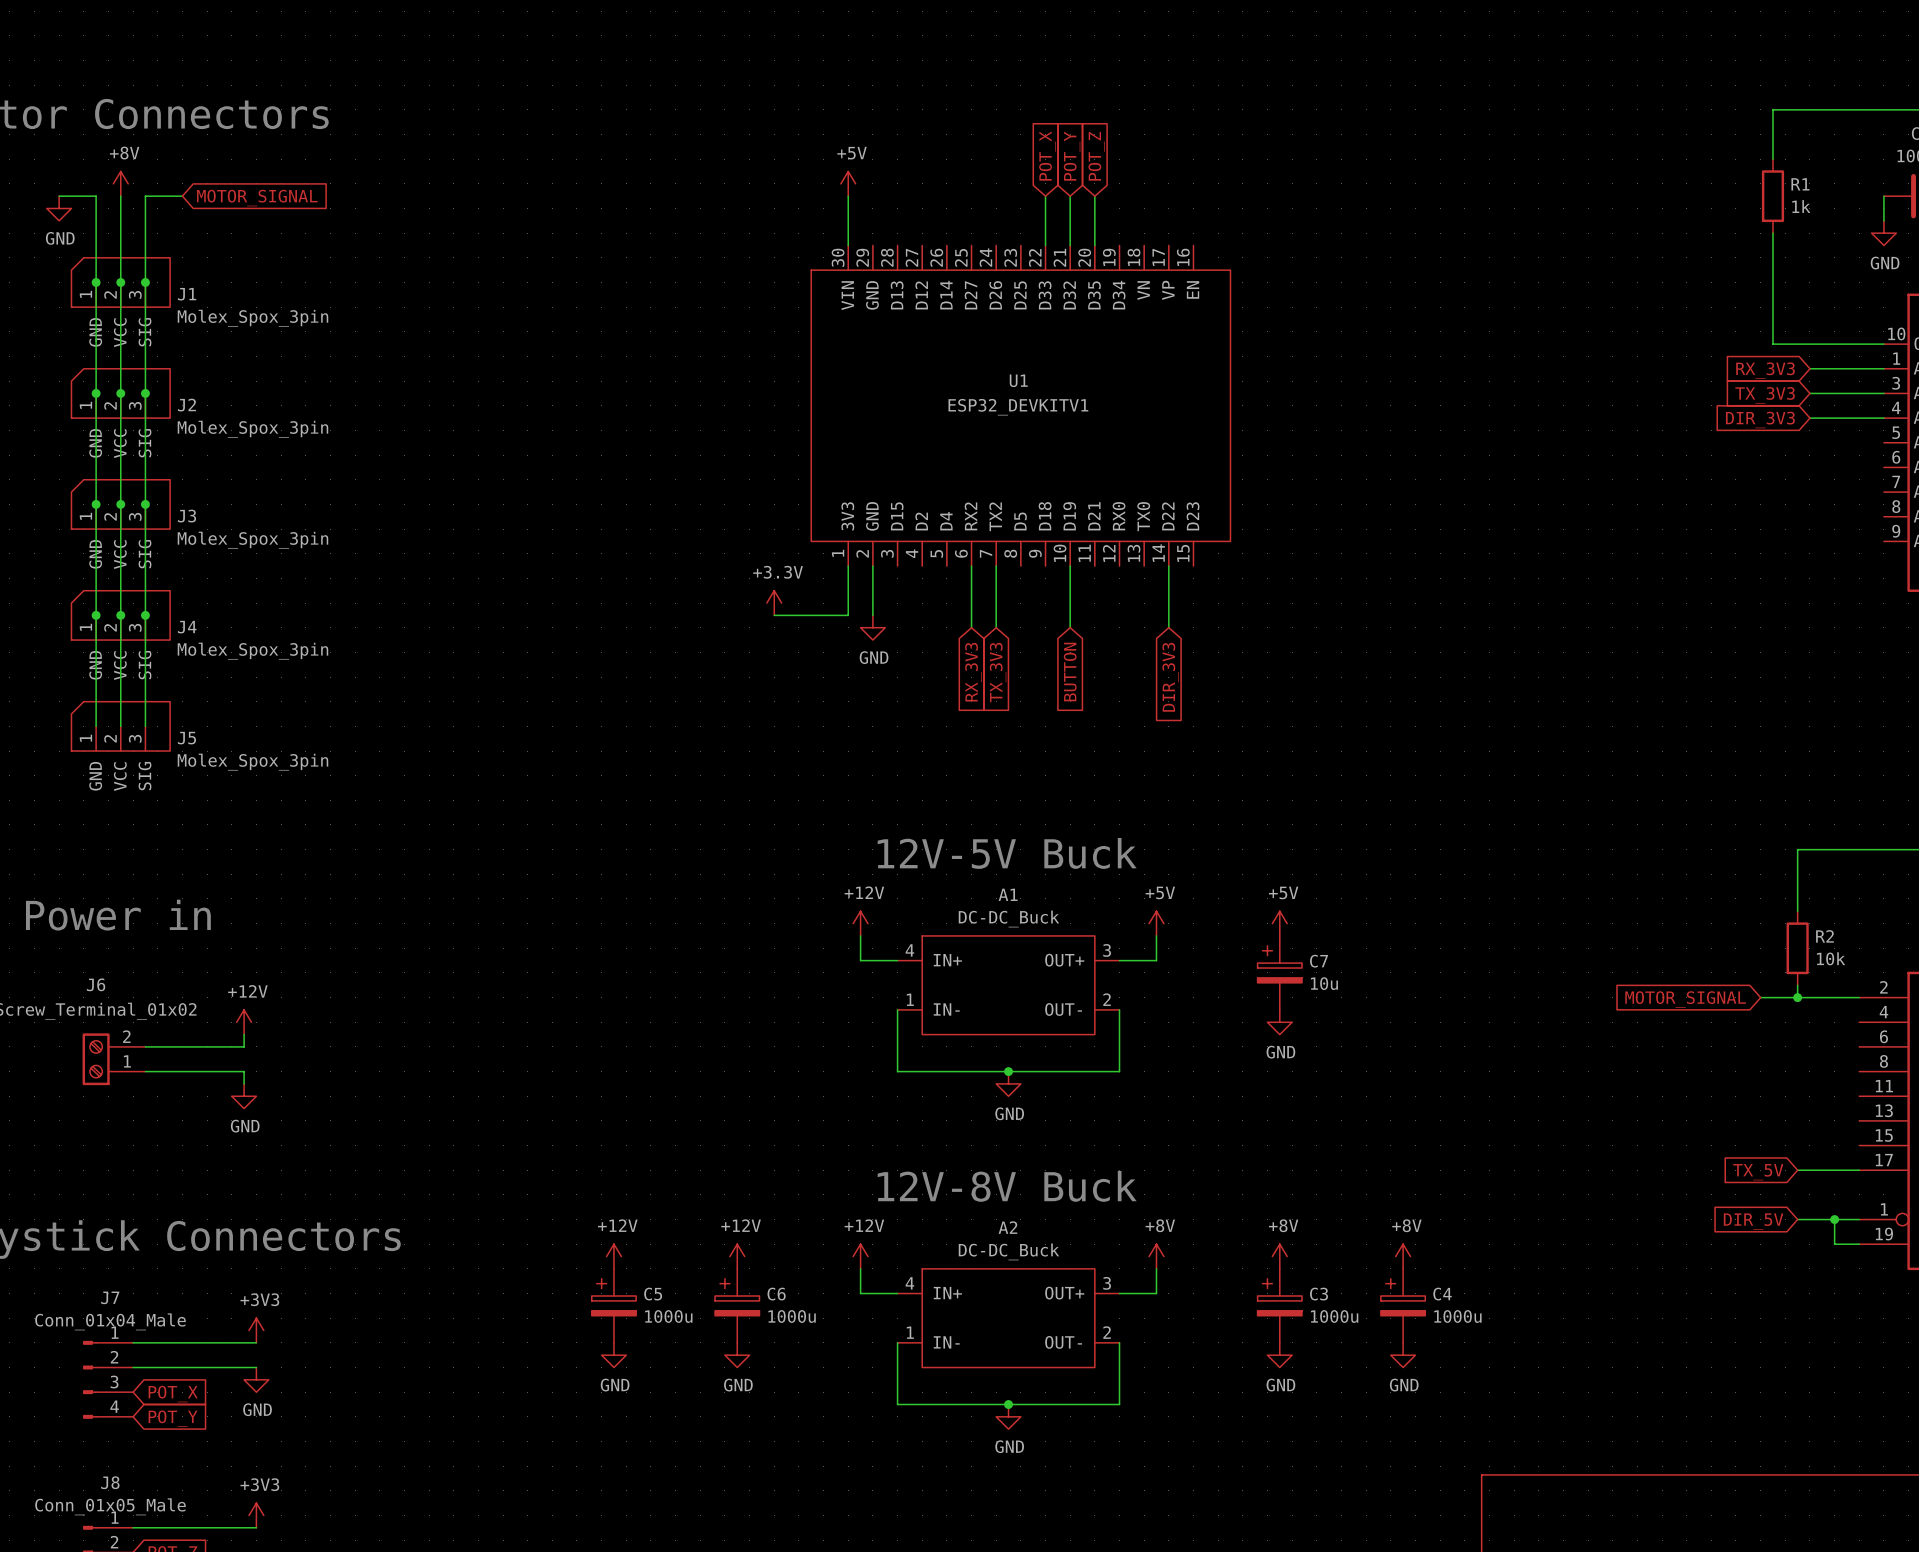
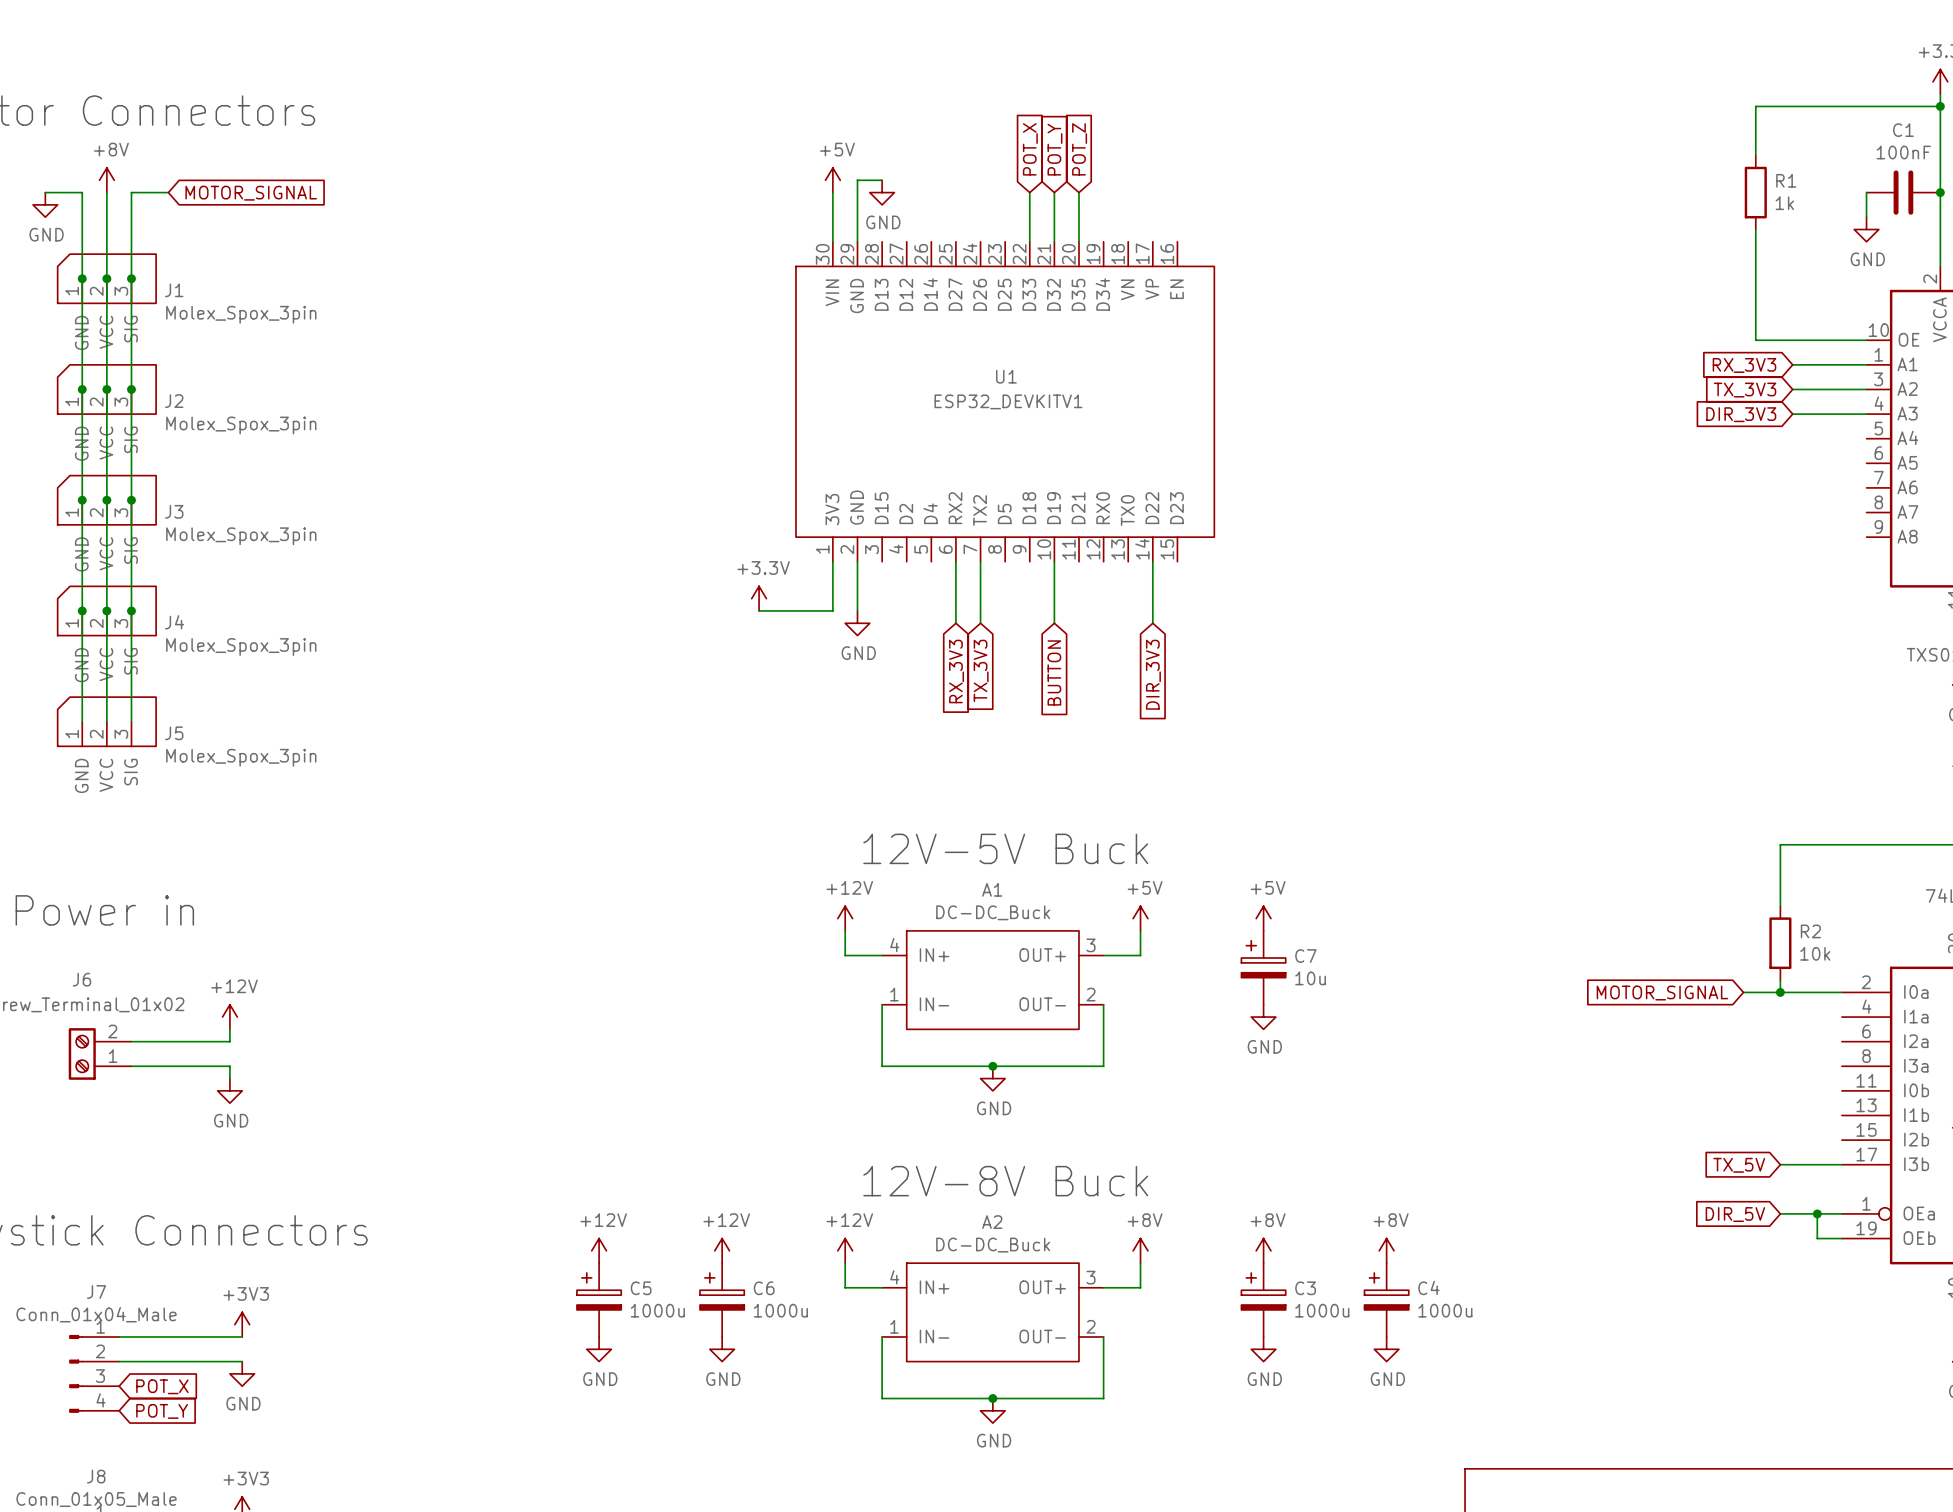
wire: none -> (882, 180) (857, 180) (857, 241)
power symbol: none -> GND (882, 192)

